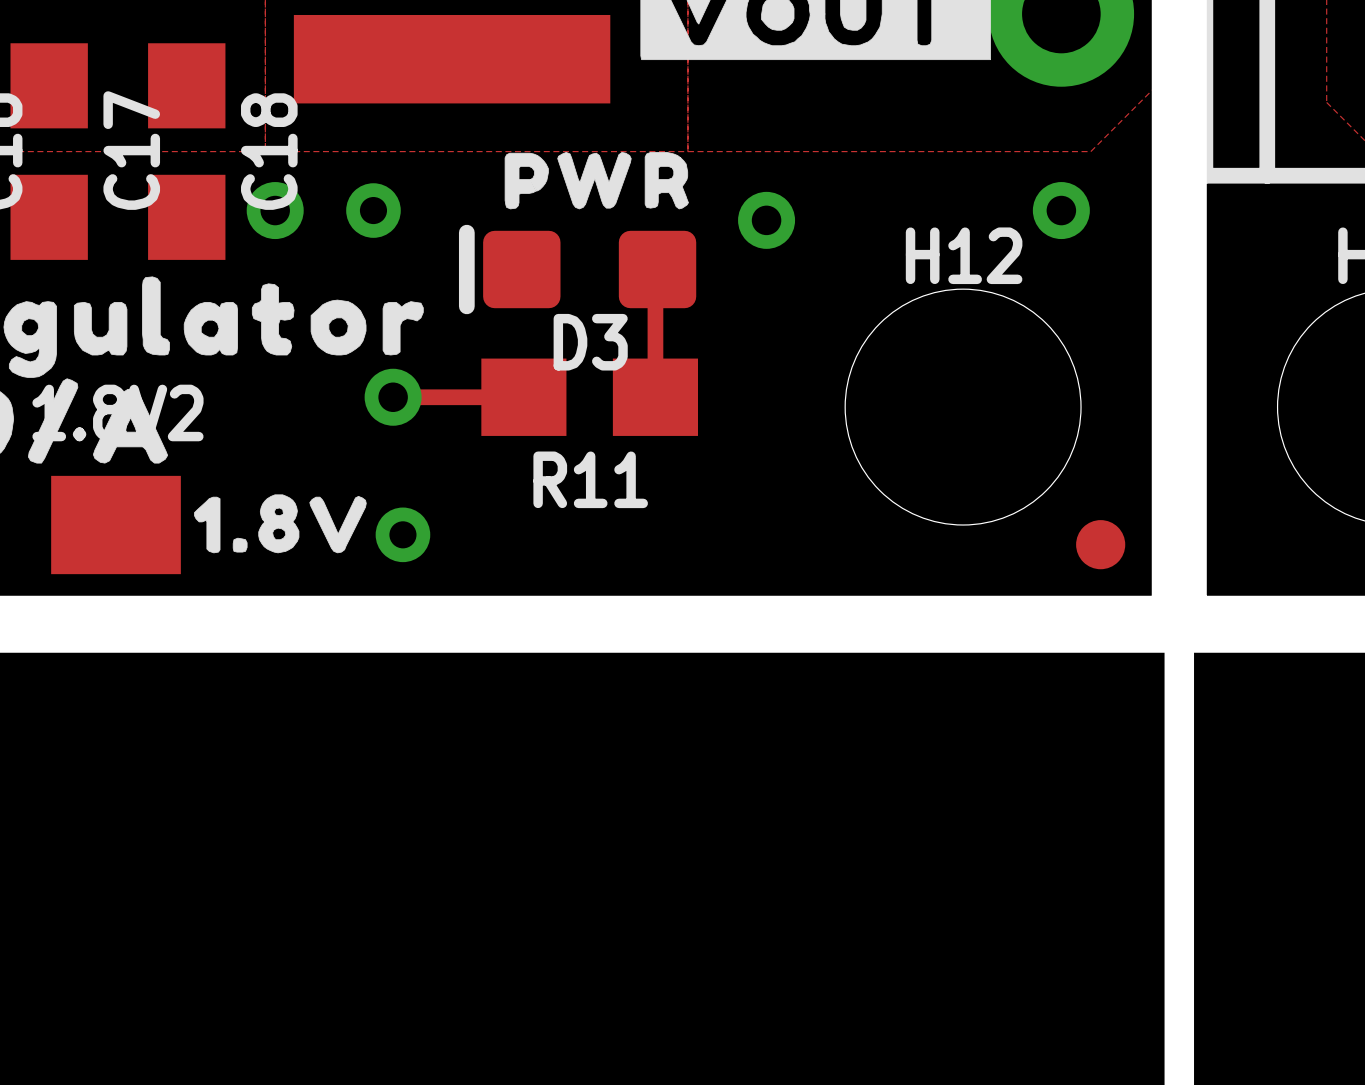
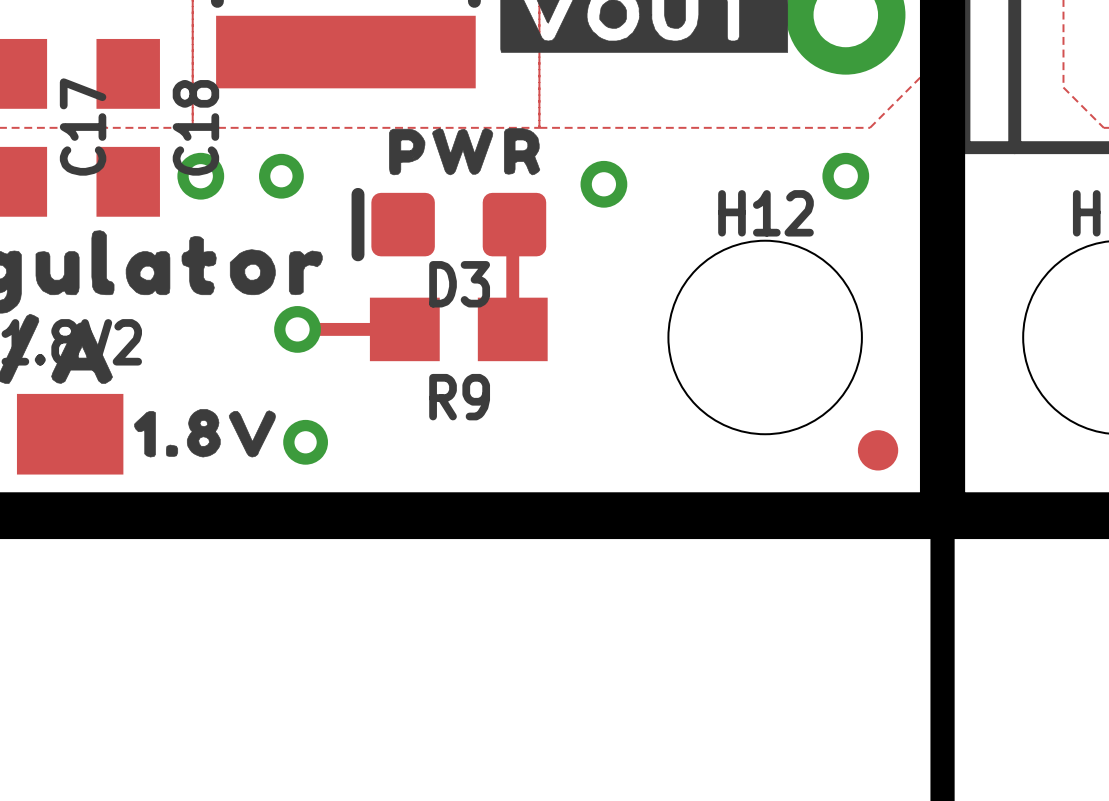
R11 name: R11 (590, 479) -> R9 (459, 397)

